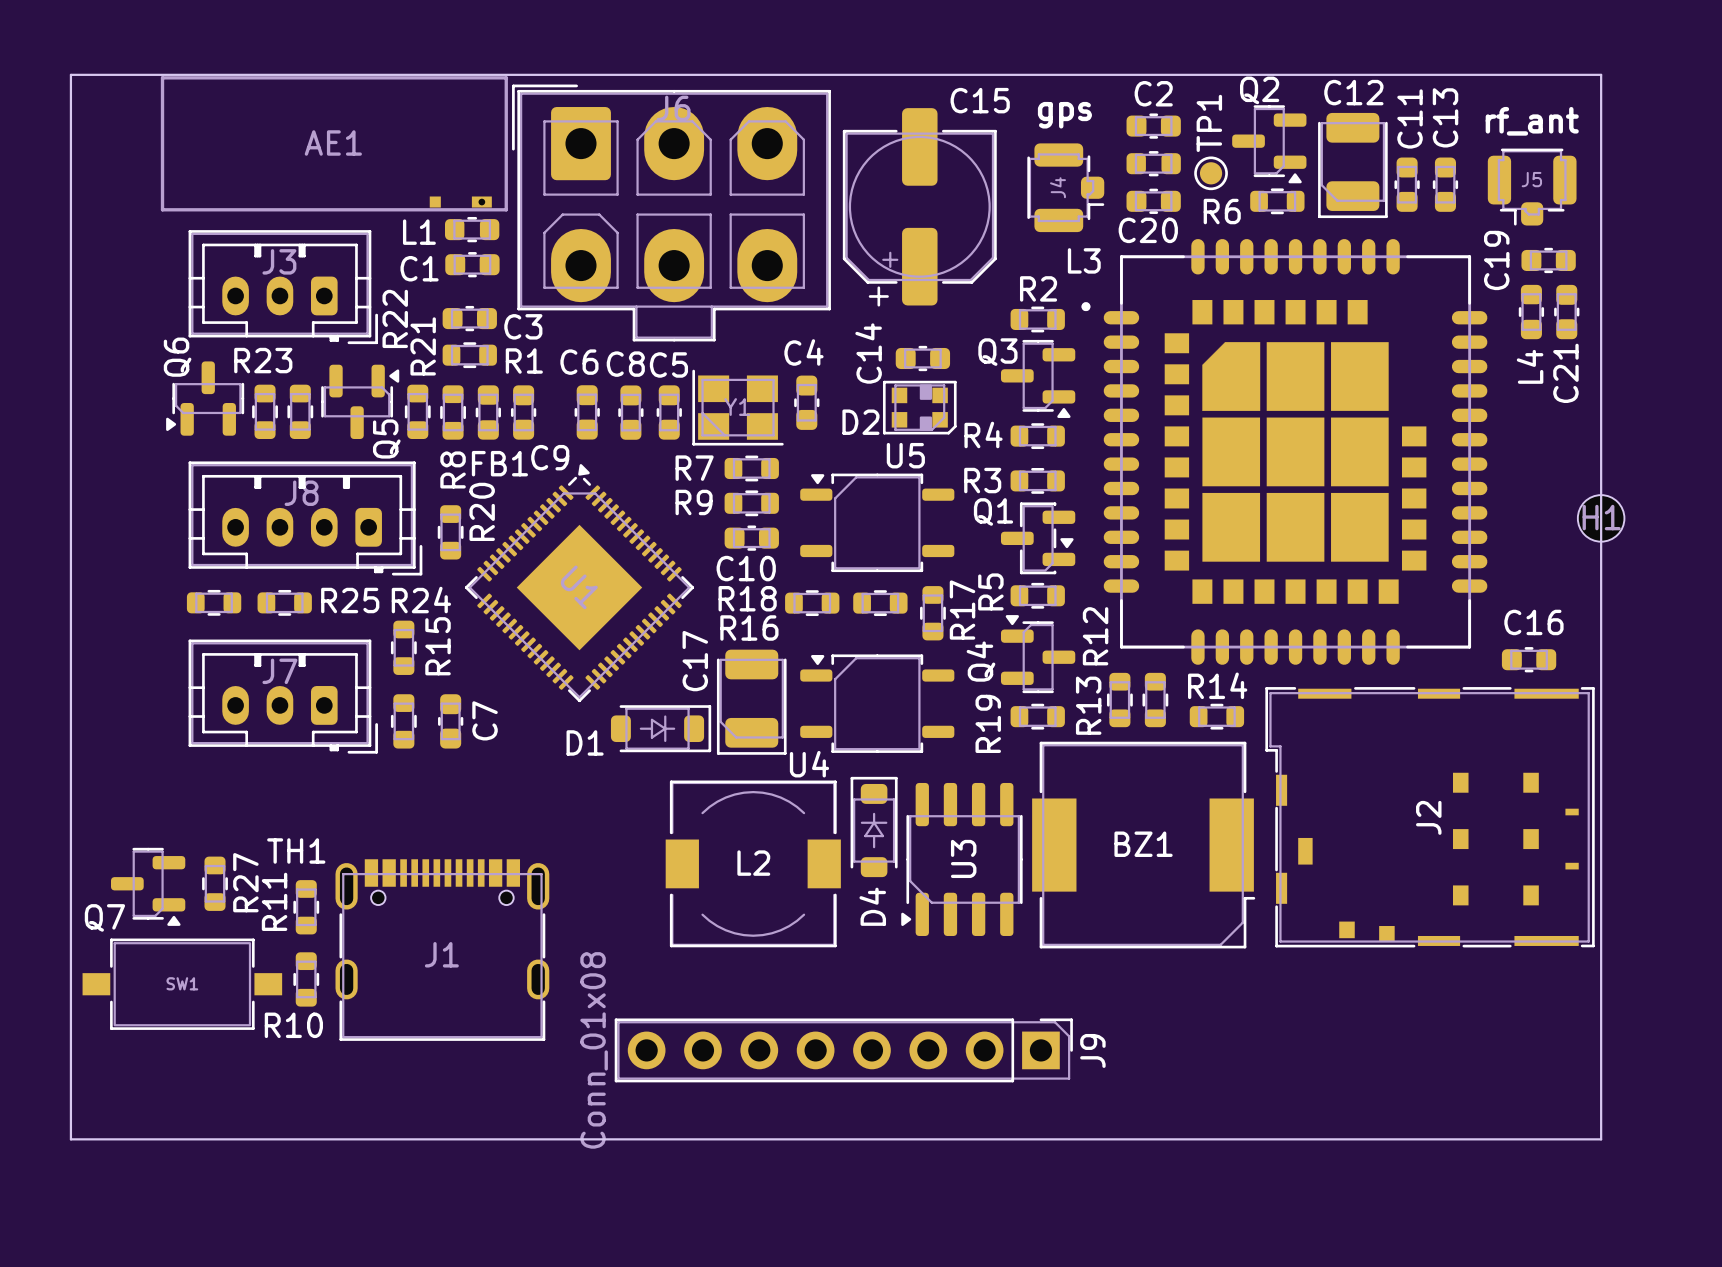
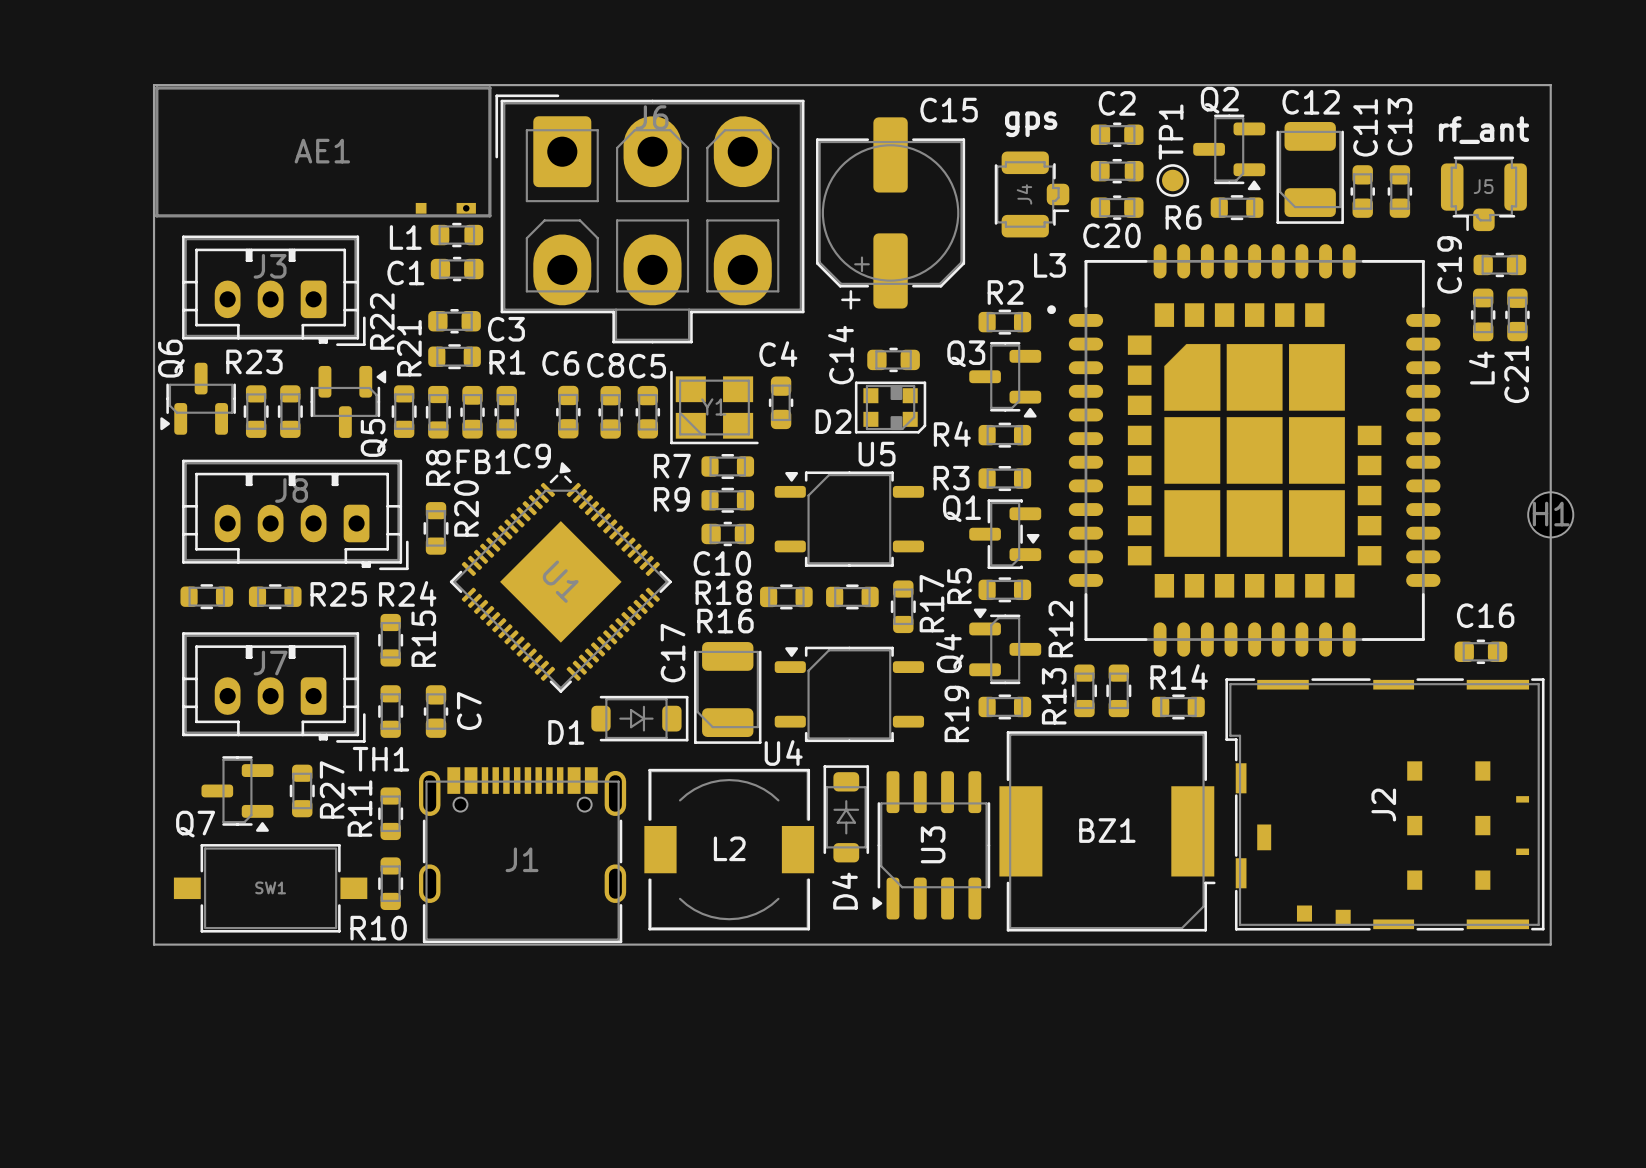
board edge: (159, 74) (70, 74) (70, 1139) (1601, 1139) (1601, 961) -> (154, 85) (154, 944) (1550, 944)
TH1 name position: TH1 (296, 850) -> TH1 (380, 759)
R27 position: (215, 883) -> (302, 790)
Q7 position: (148, 886) -> (237, 793)
R11 position: (306, 907) -> (390, 813)
J1 position: (442, 950) -> (522, 855)
R10 position: (306, 979) -> (390, 883)
SW1 position: (182, 984) -> (270, 888)
J9: Conn_01x08 (843, 1050) -> none

